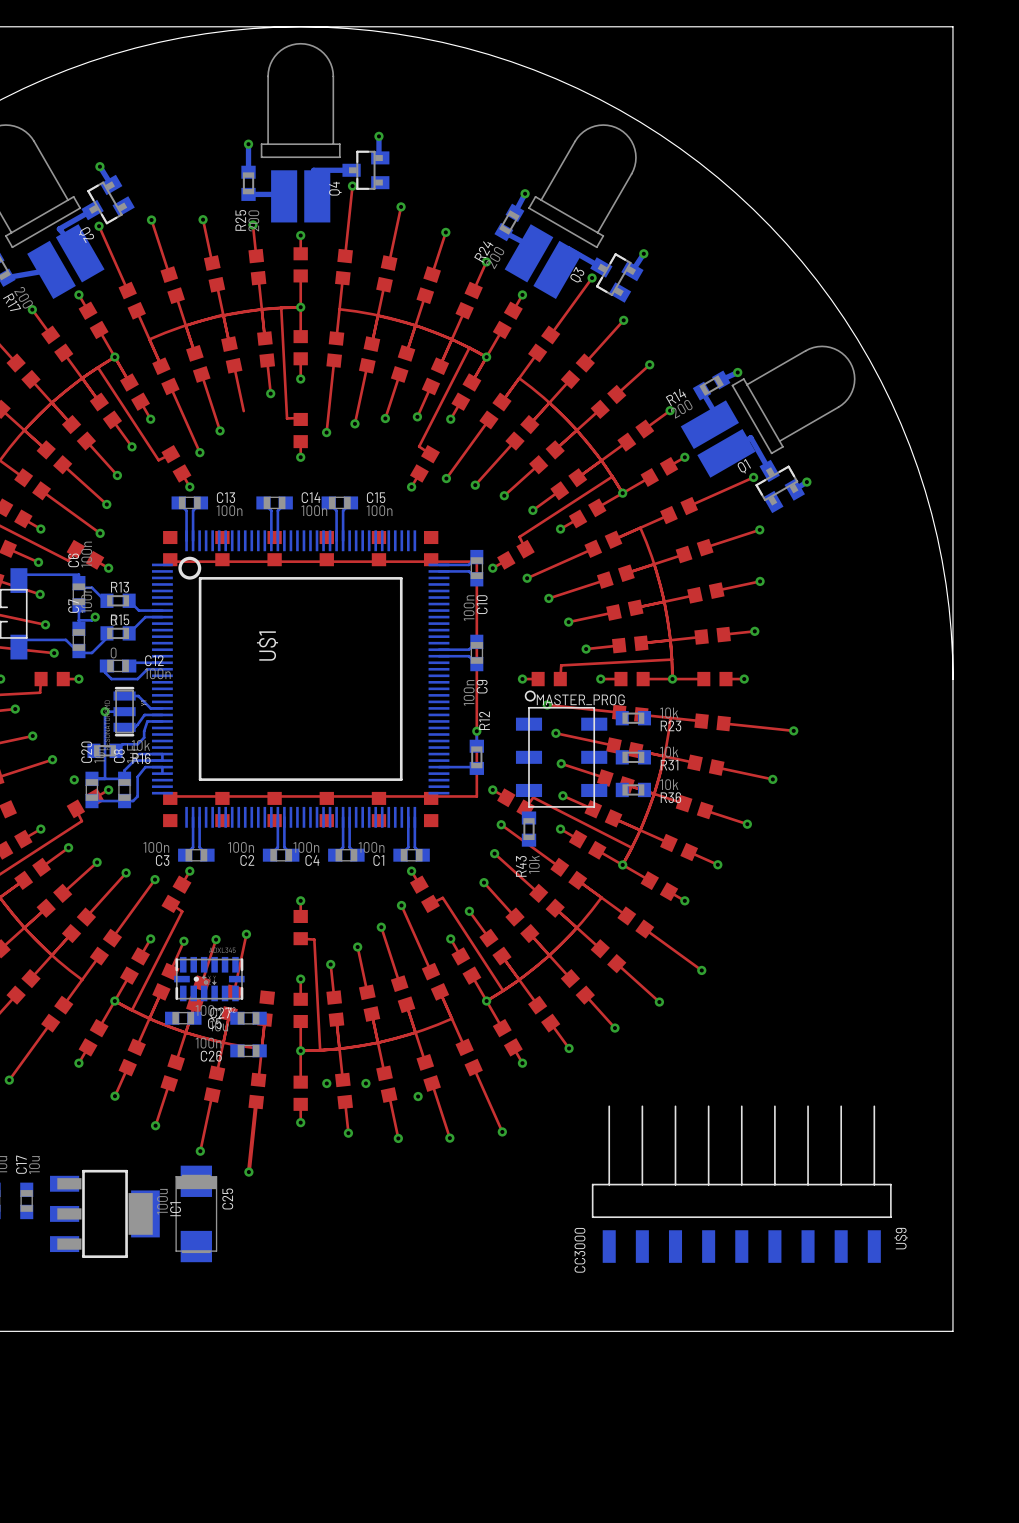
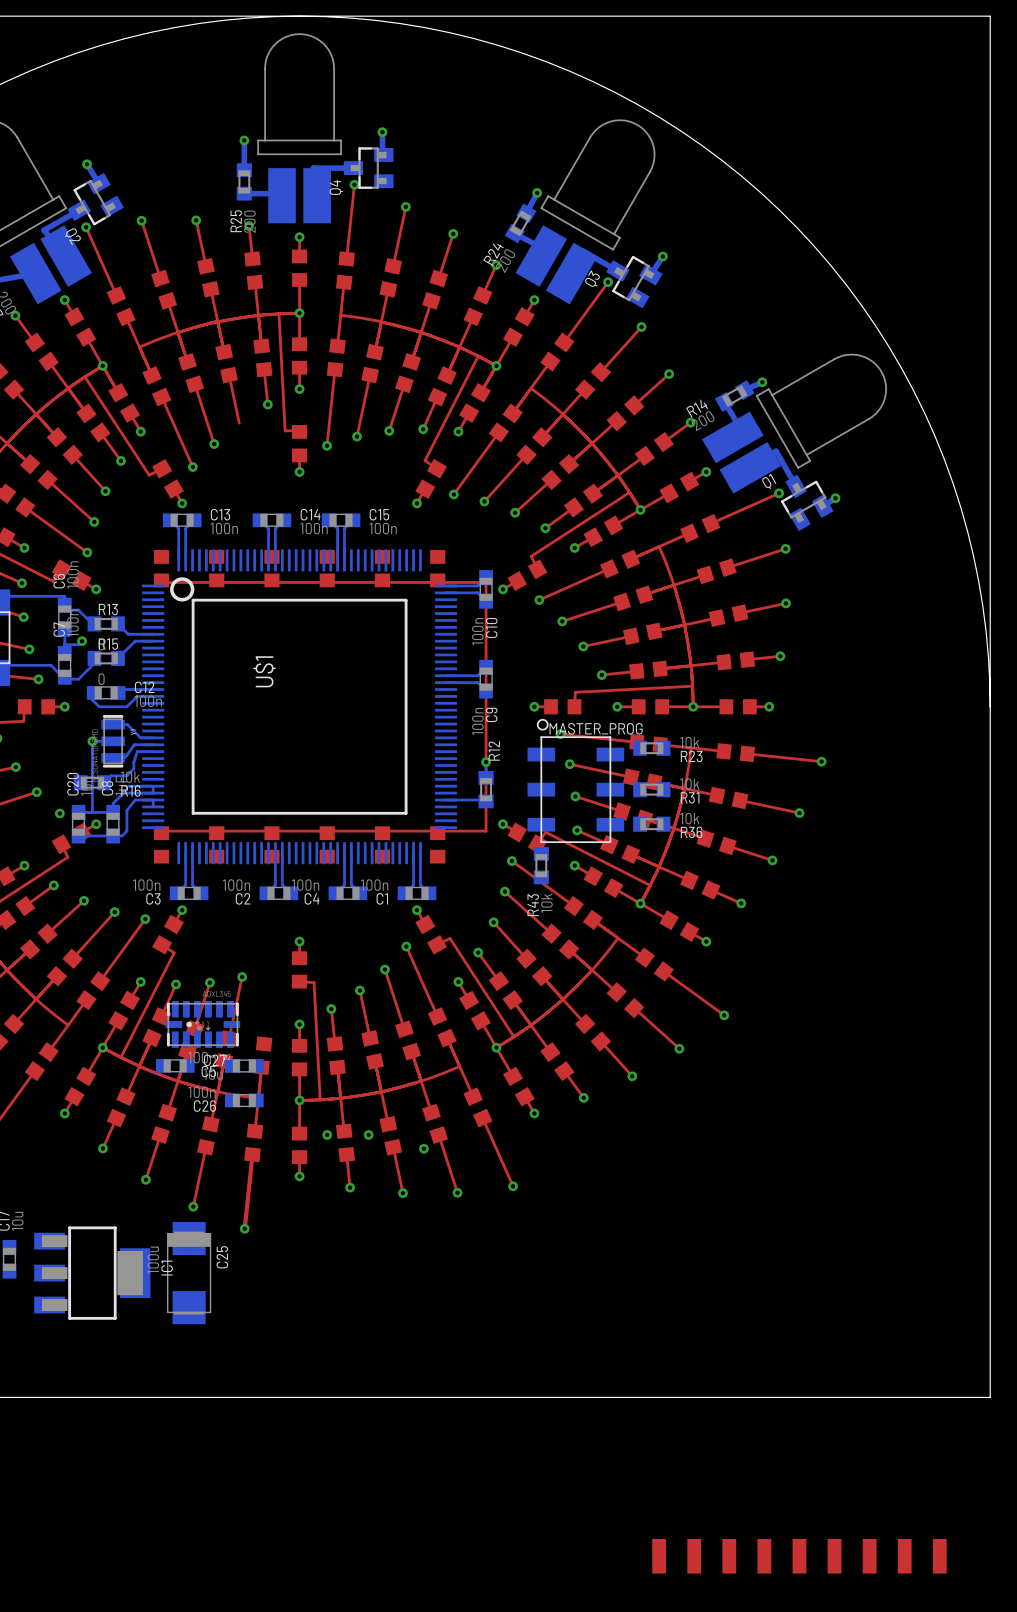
U$9 side: bottom (741, 1184) -> top (799, 1556)

